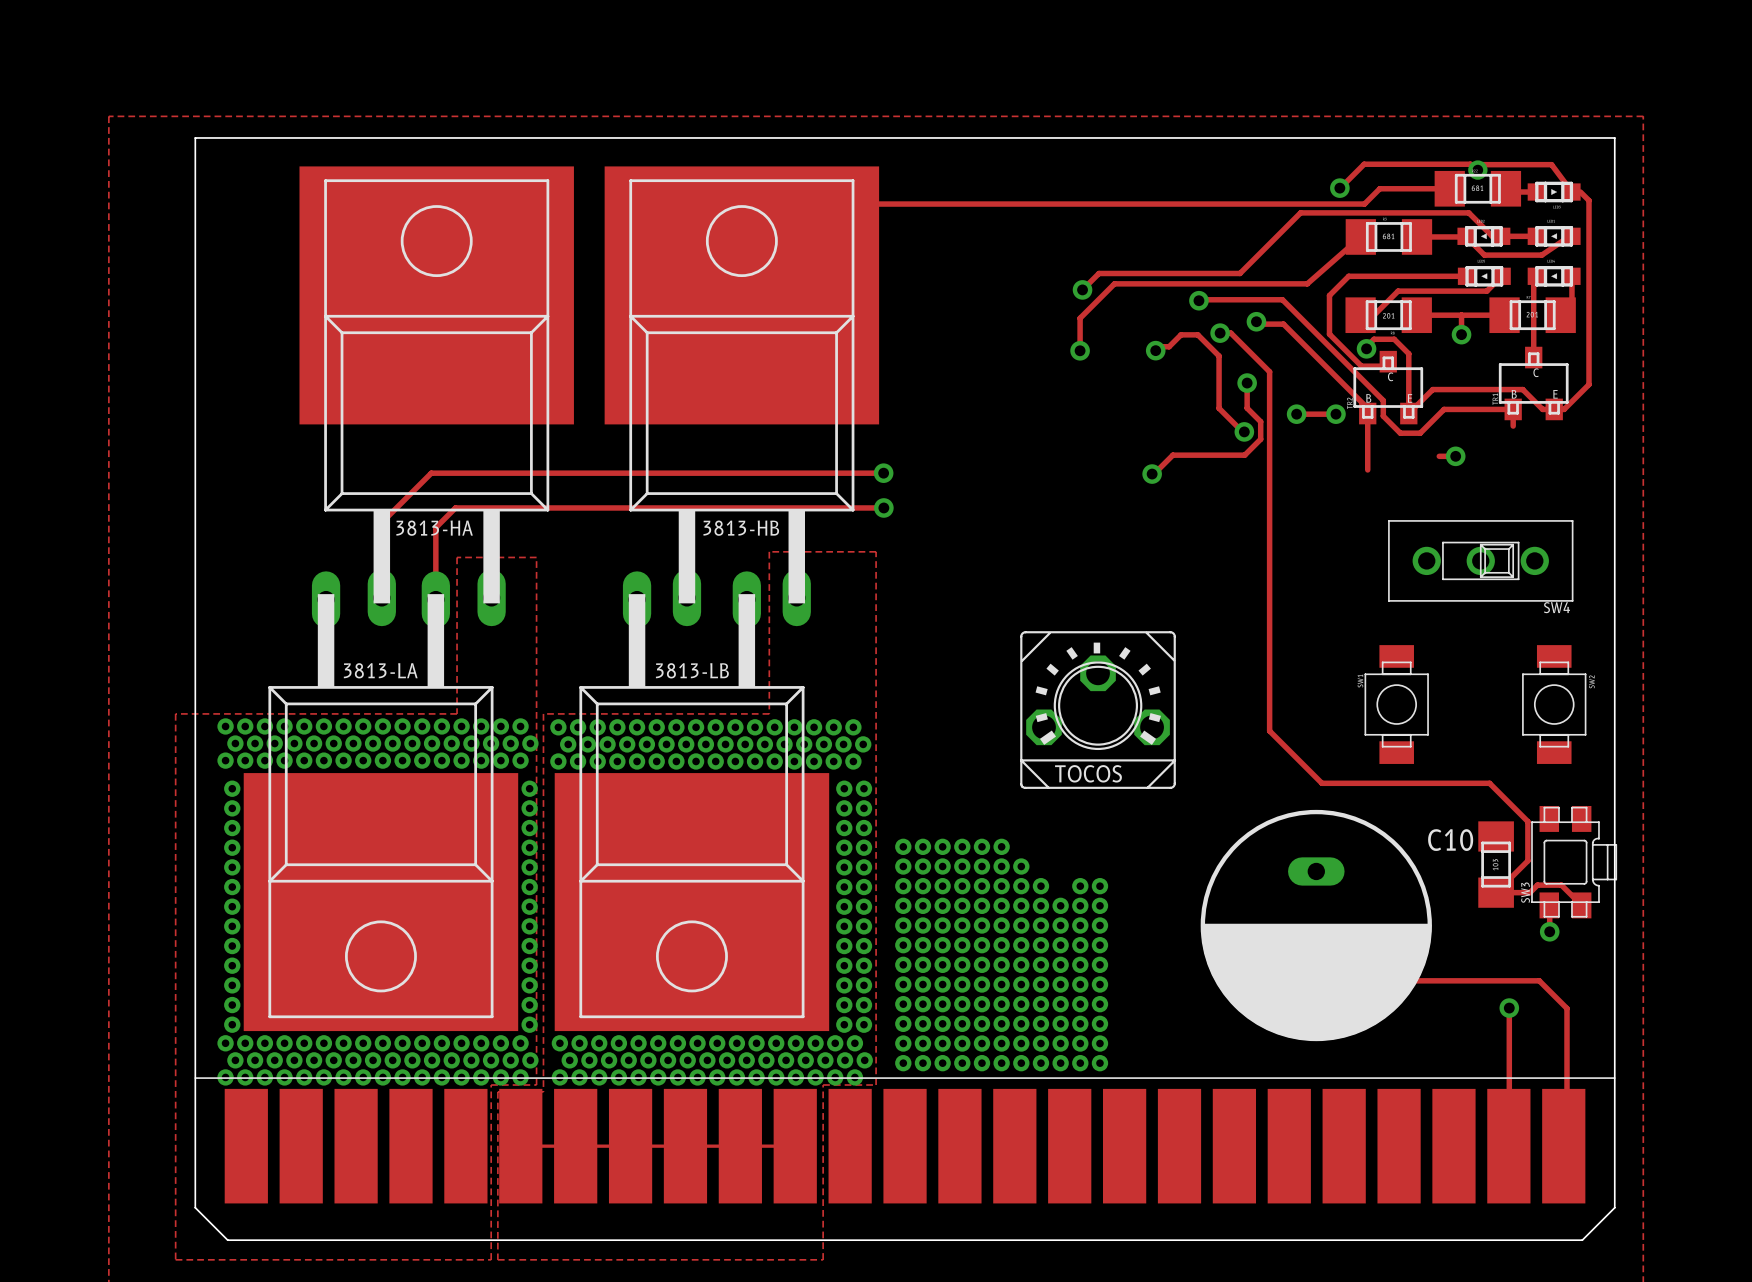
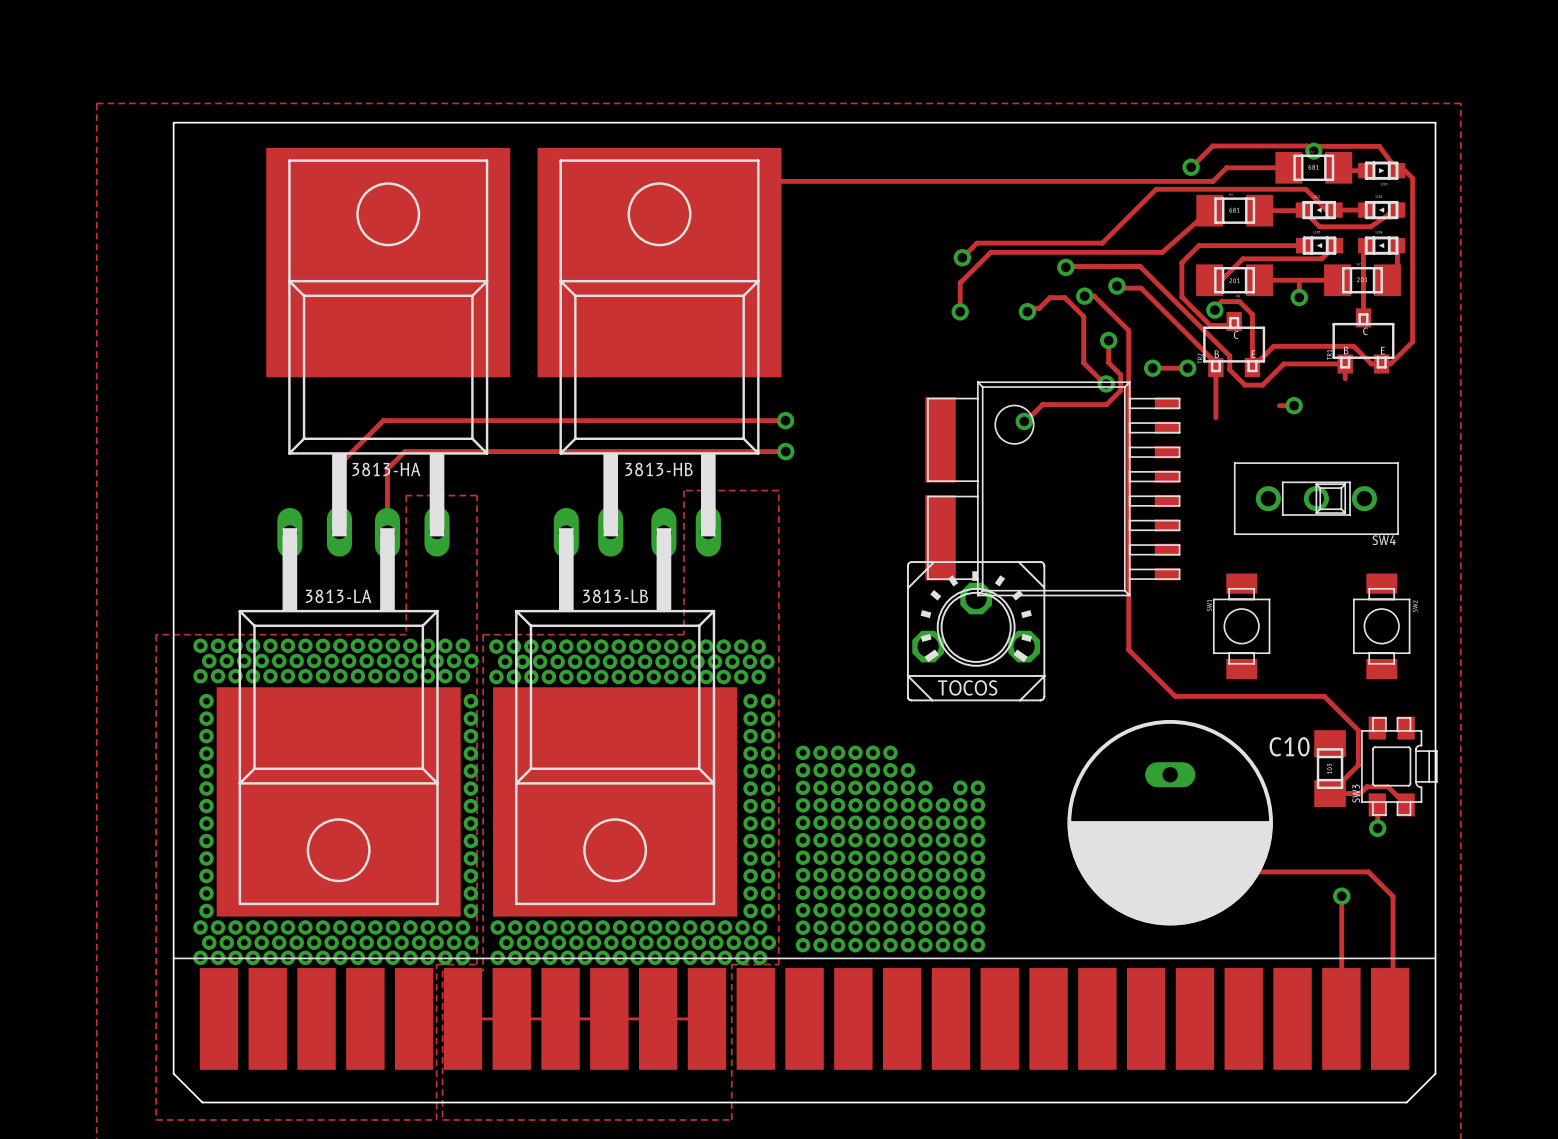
part: none -> (1052, 488)

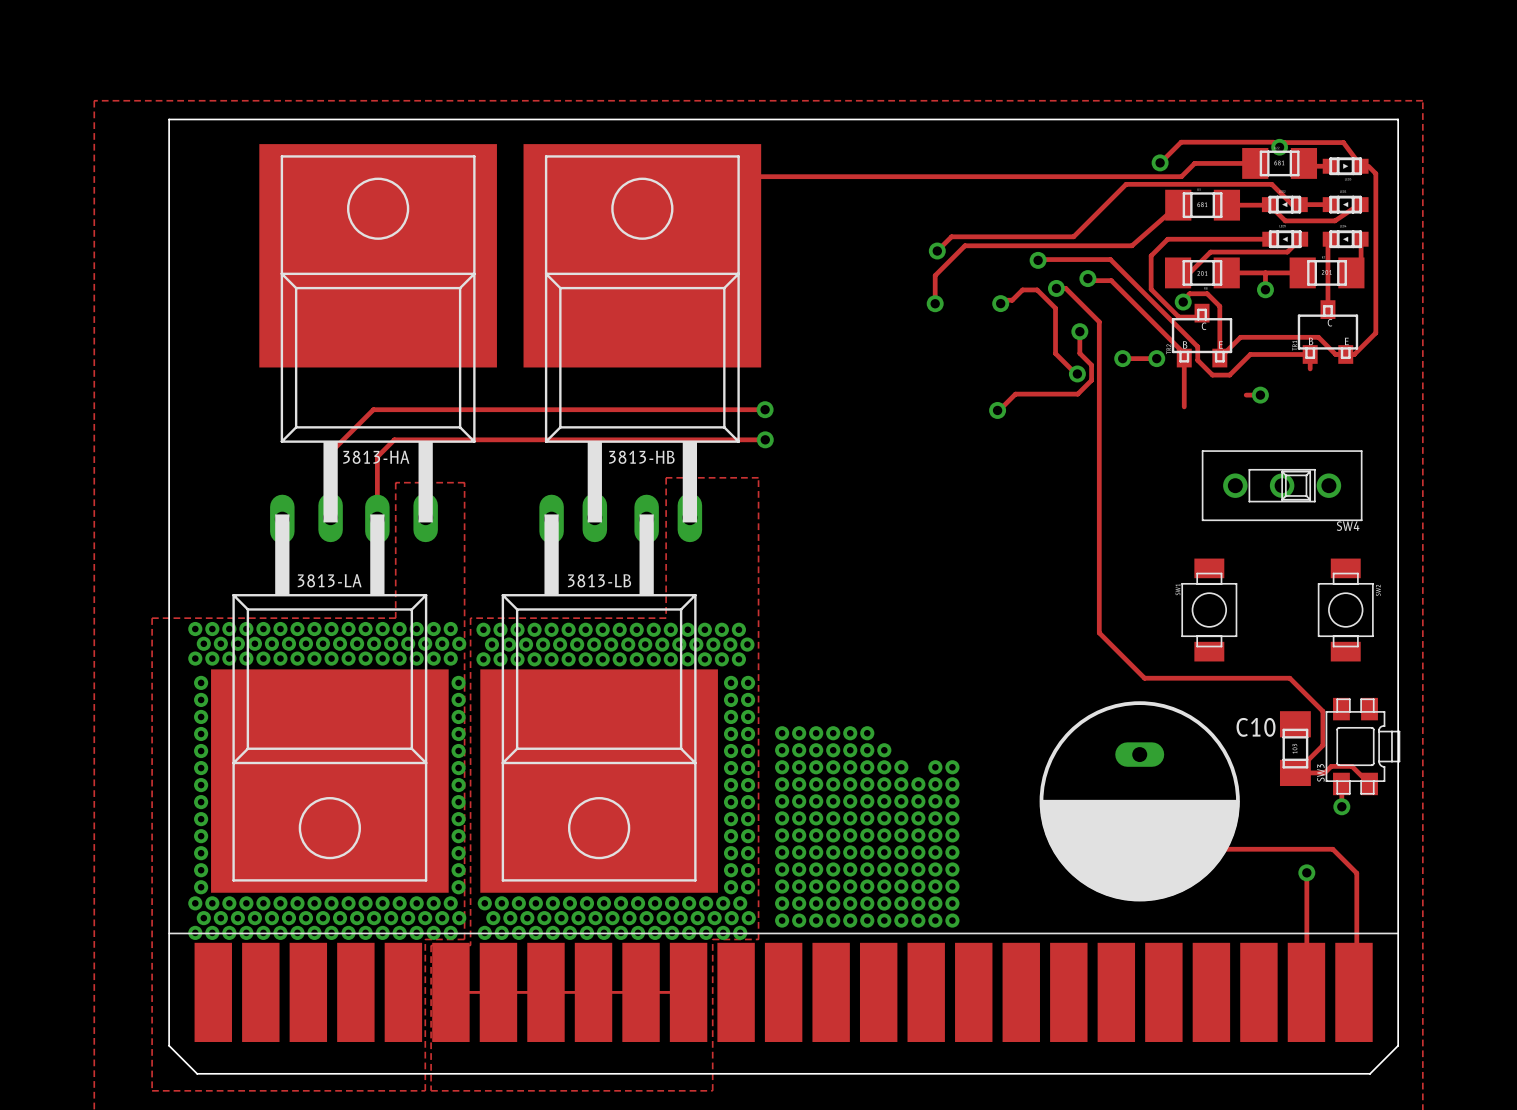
part: (1052, 488) -> none
part: (976, 631) -> none

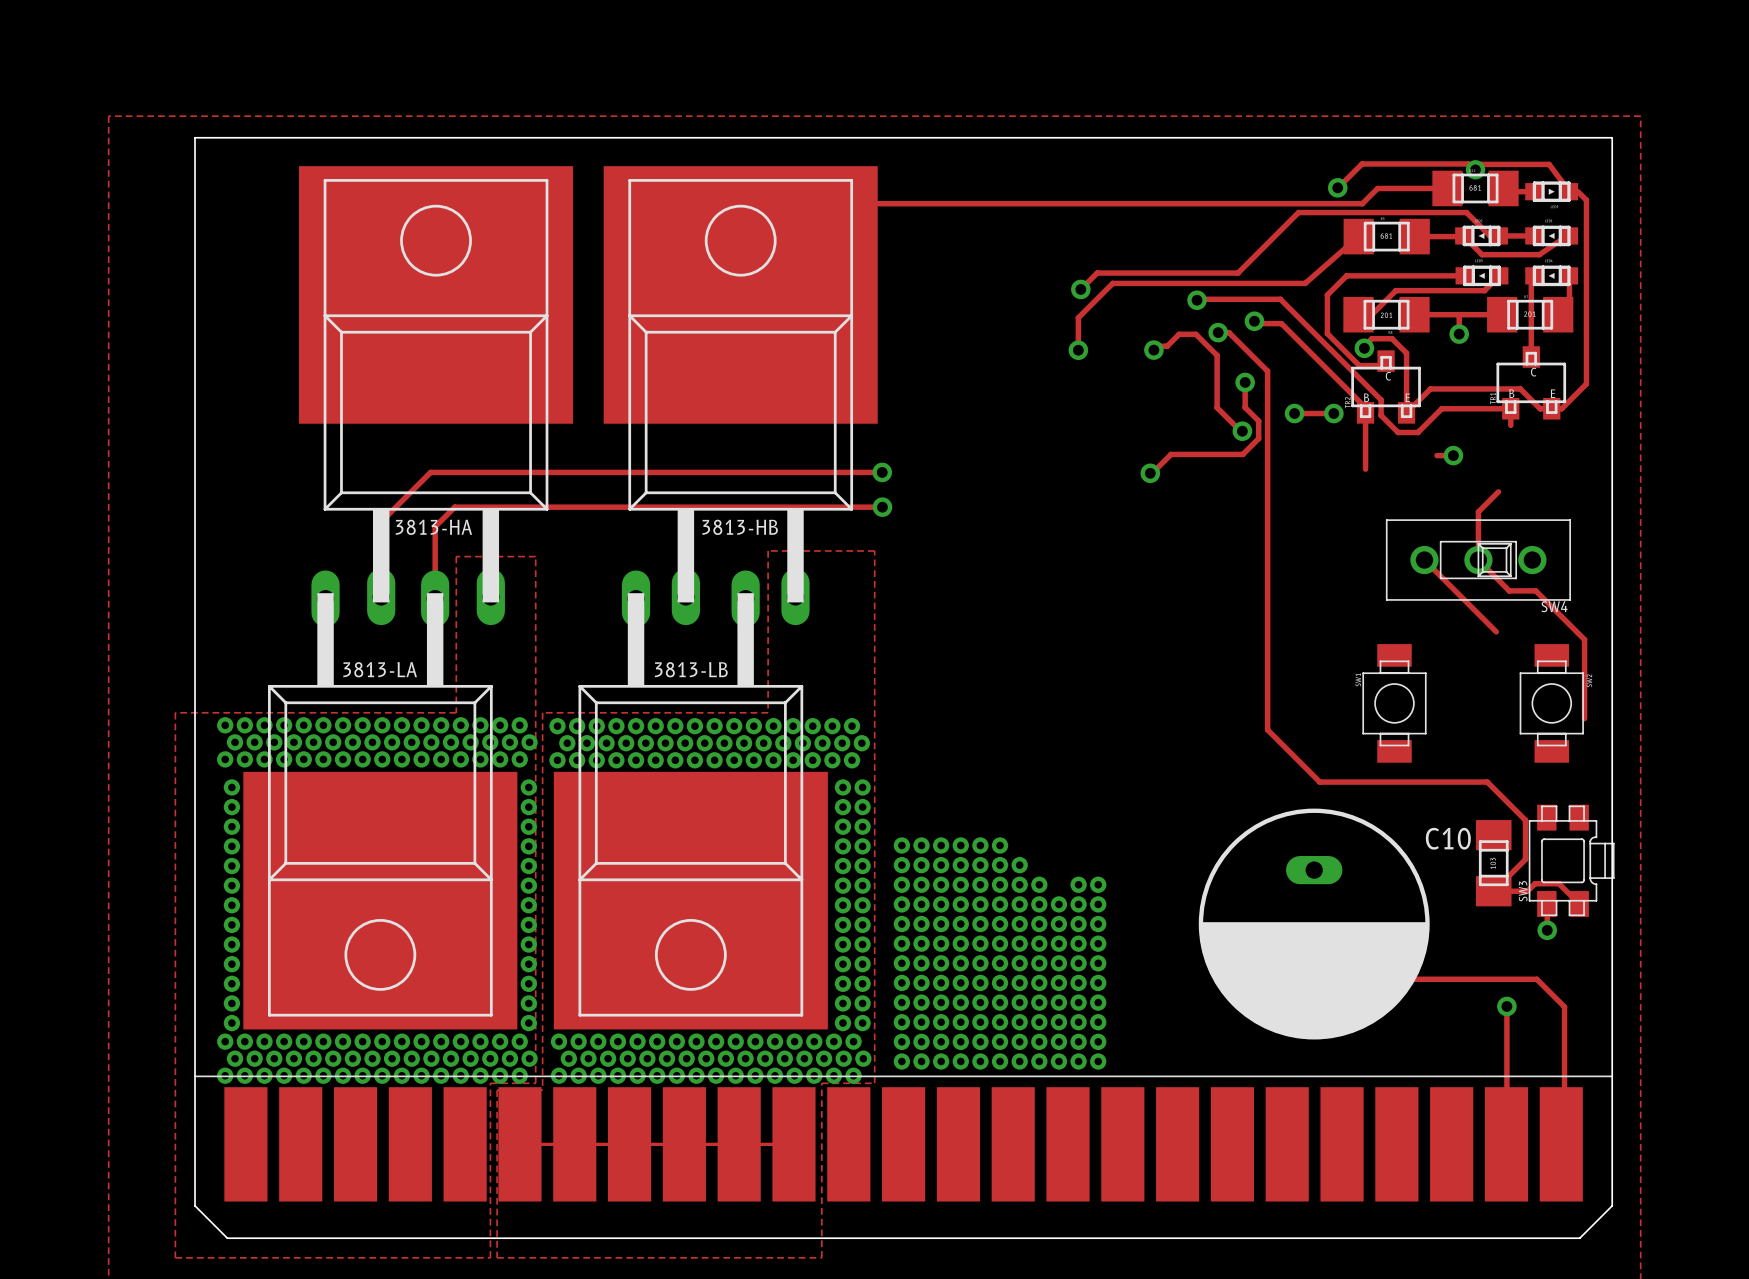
track: none -> (1498, 491) (1478, 511) (1478, 560) (1509, 590) (1535, 590) (1584, 639) (1584, 718)
track: none -> (1424, 560) (1496, 631)

